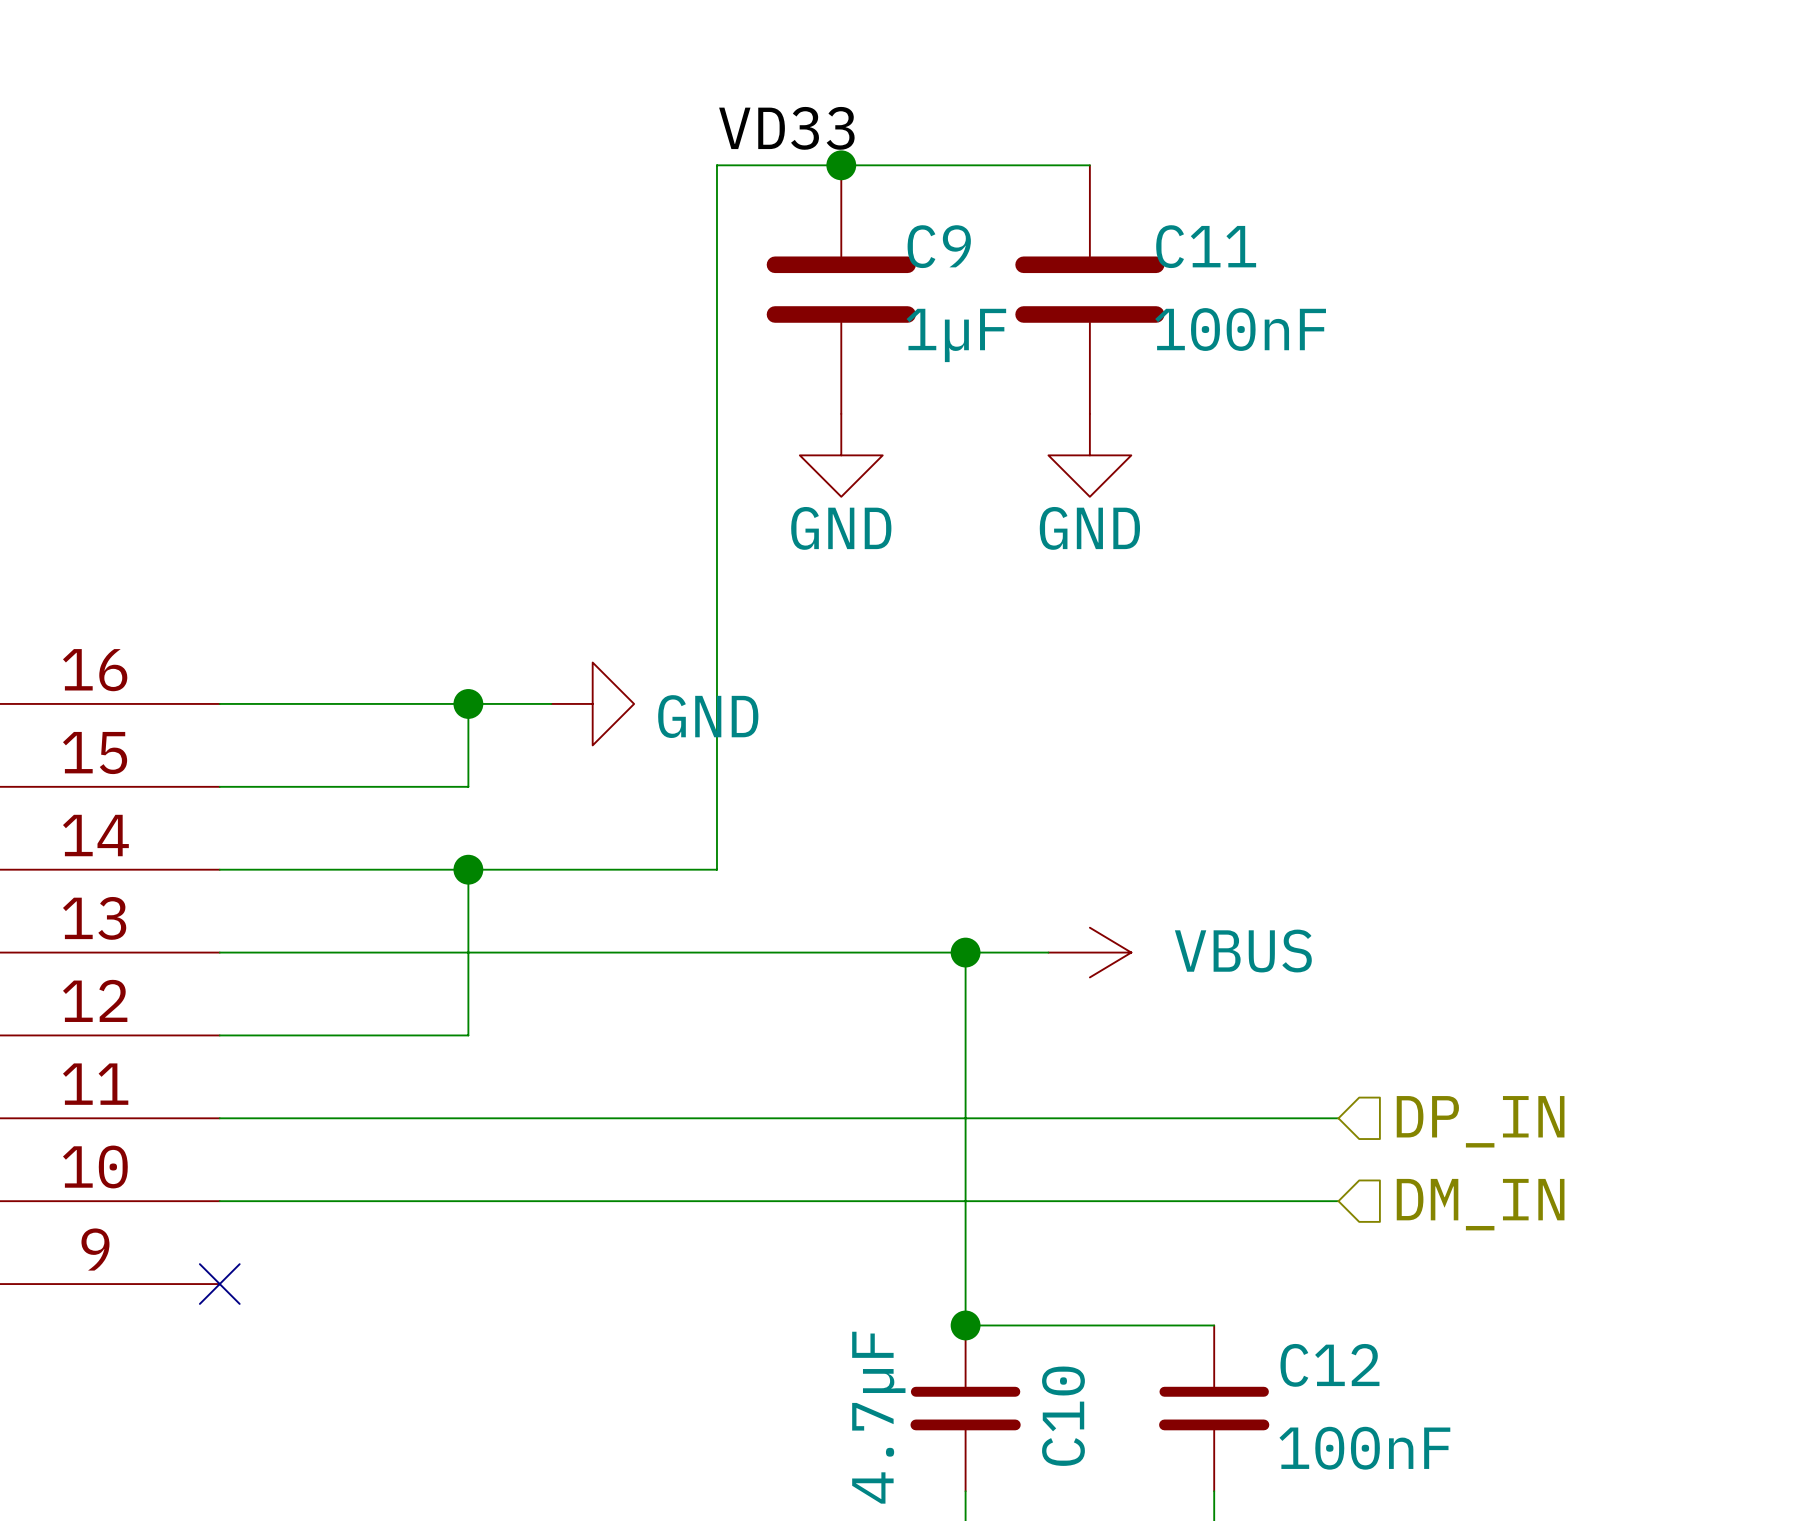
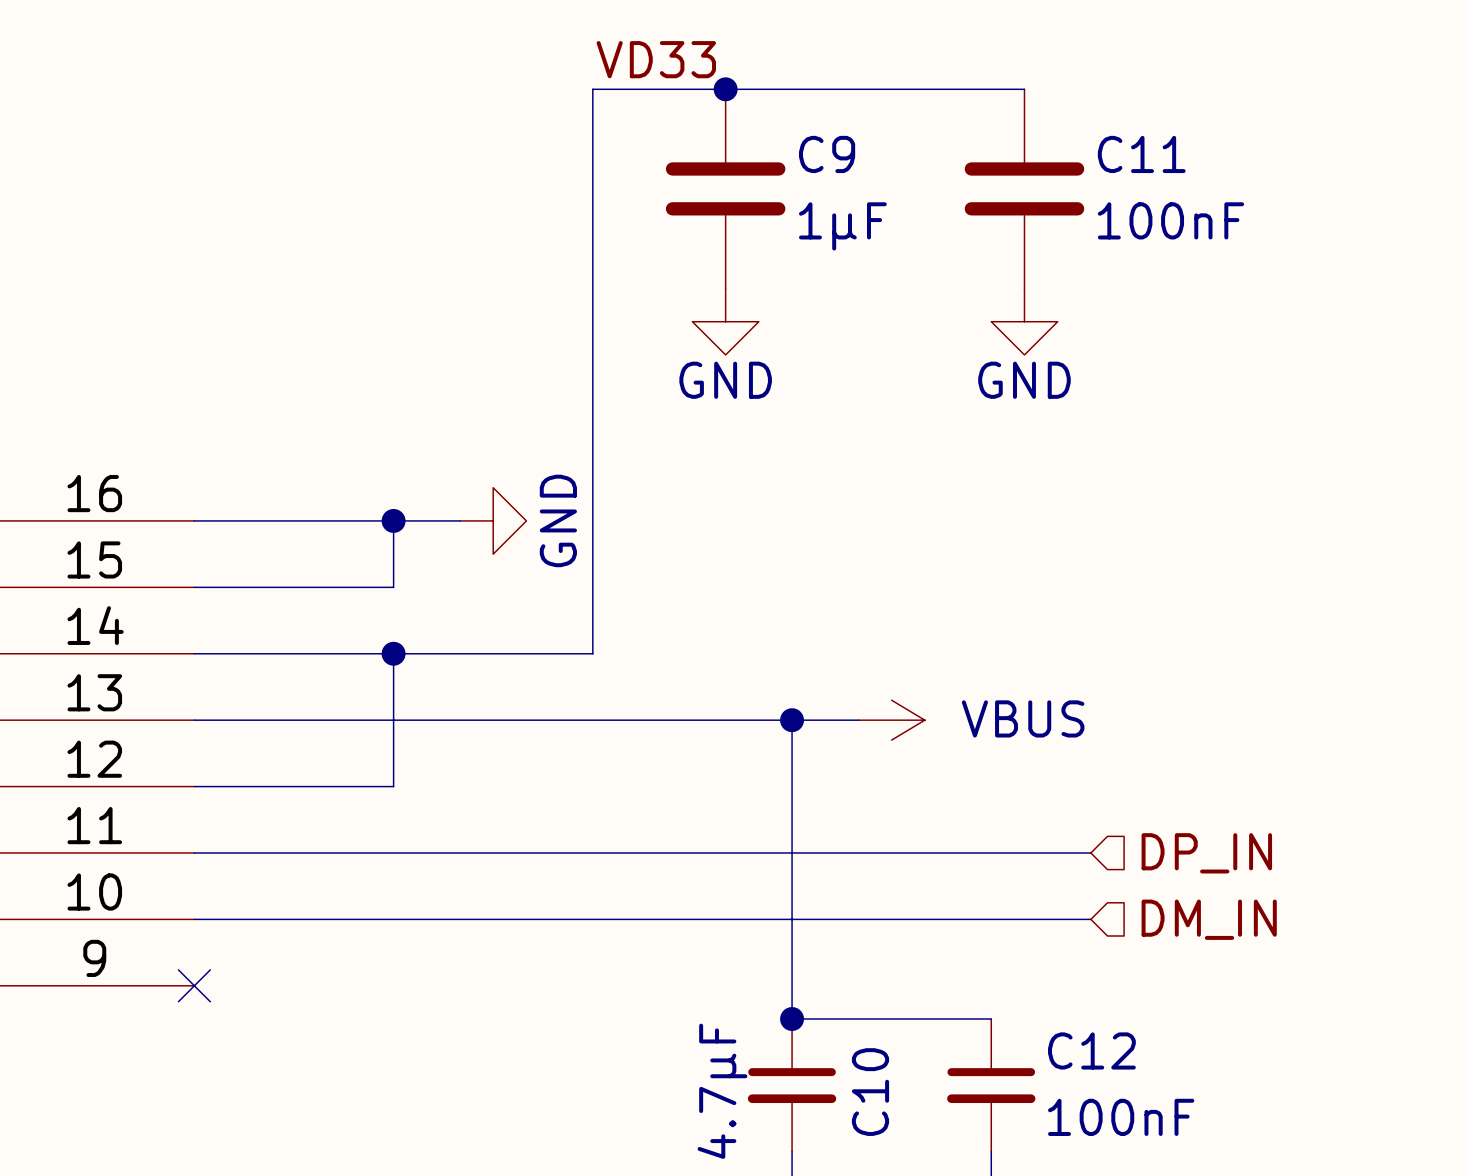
junction position: (841, 165) -> (725, 89)
wire: none -> (891, 89) (1024, 89)
C9 name position: C9 (939, 246) -> C9 (827, 154)
C11 name position: C11 (1206, 246) -> C11 (1141, 154)
C9 position: (841, 289) -> (725, 188)
C11 position: (1089, 289) -> (1024, 188)
C11 value position: 100nF (1240, 329) -> 100nF (1170, 220)
C9 value position: 1µF (956, 335) -> 1µF (842, 226)
power symbol position: GND (841, 455) -> GND (725, 321)
power symbol: GND (1089, 455) -> none
power symbol: none -> GND (1024, 321)
power symbol text rotation: 0° (708, 716) -> 90° counterclockwise (558, 520)

